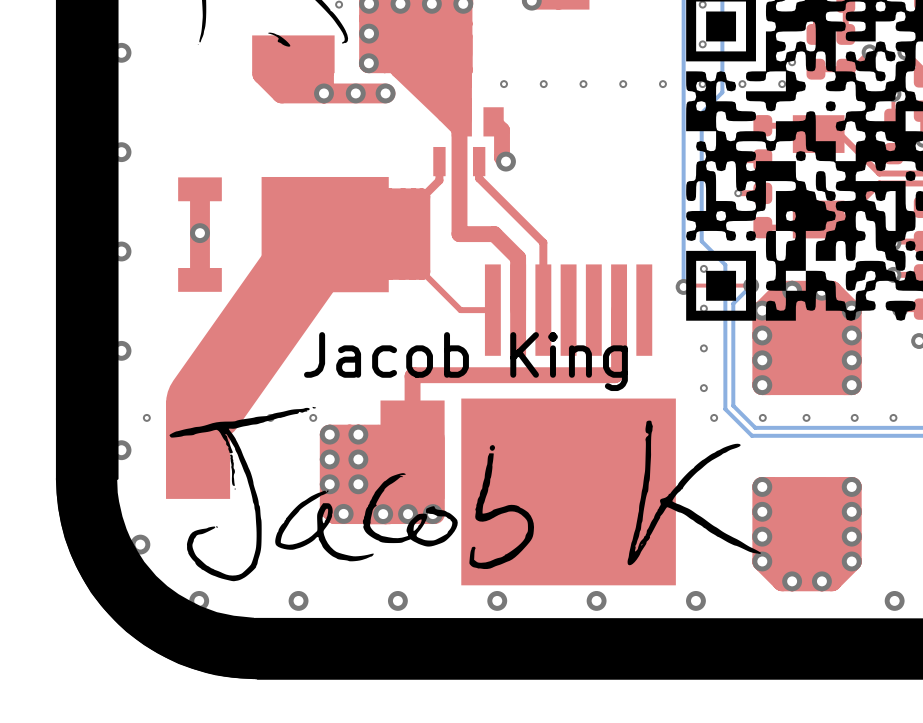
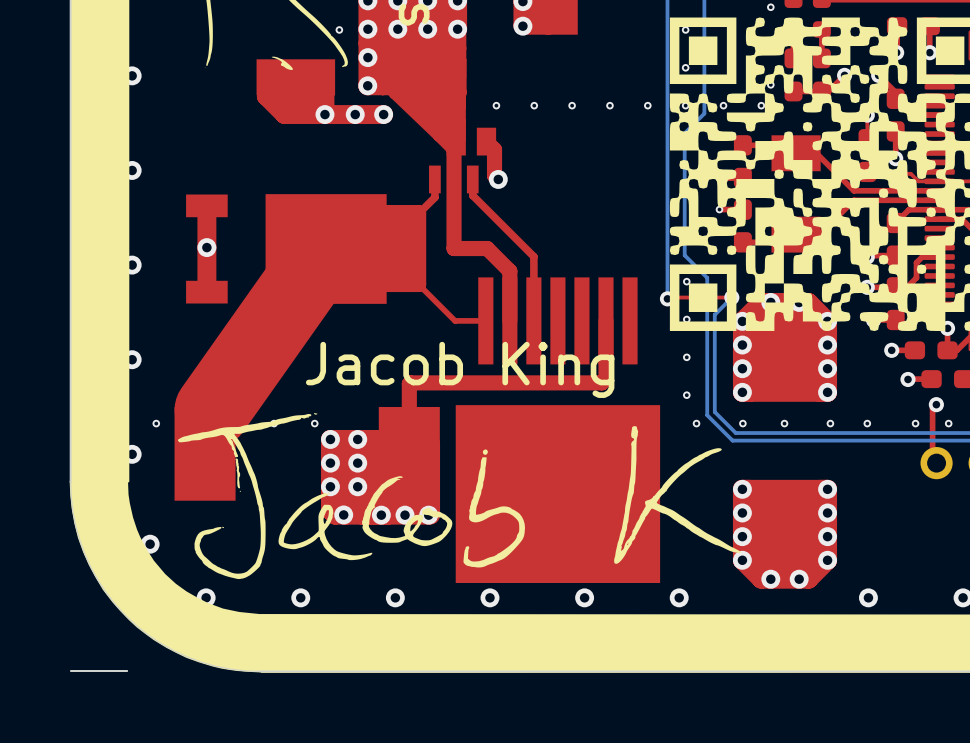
board edge: none -> (127, 670) (70, 670)

